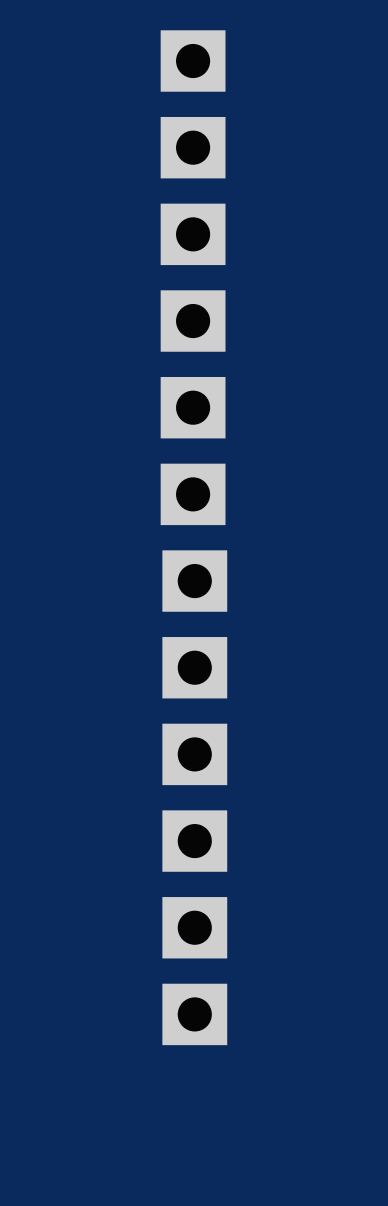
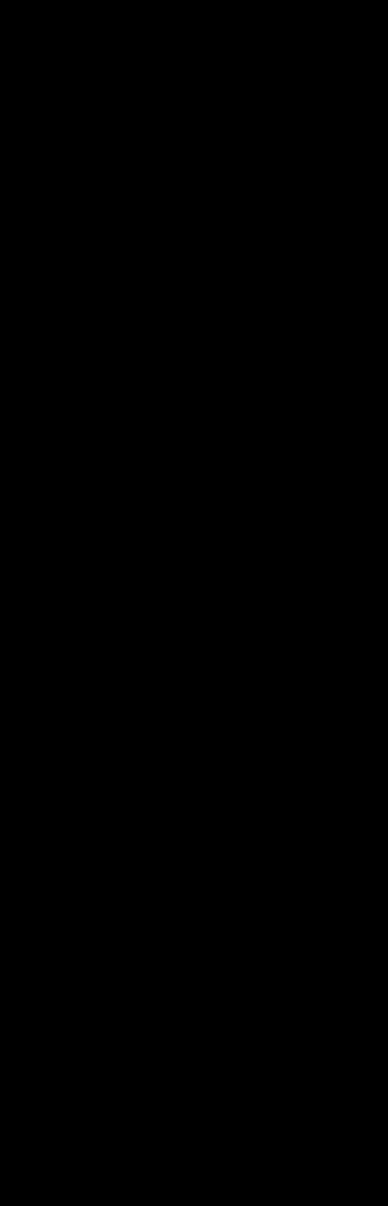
part: (193, 537) -> none

